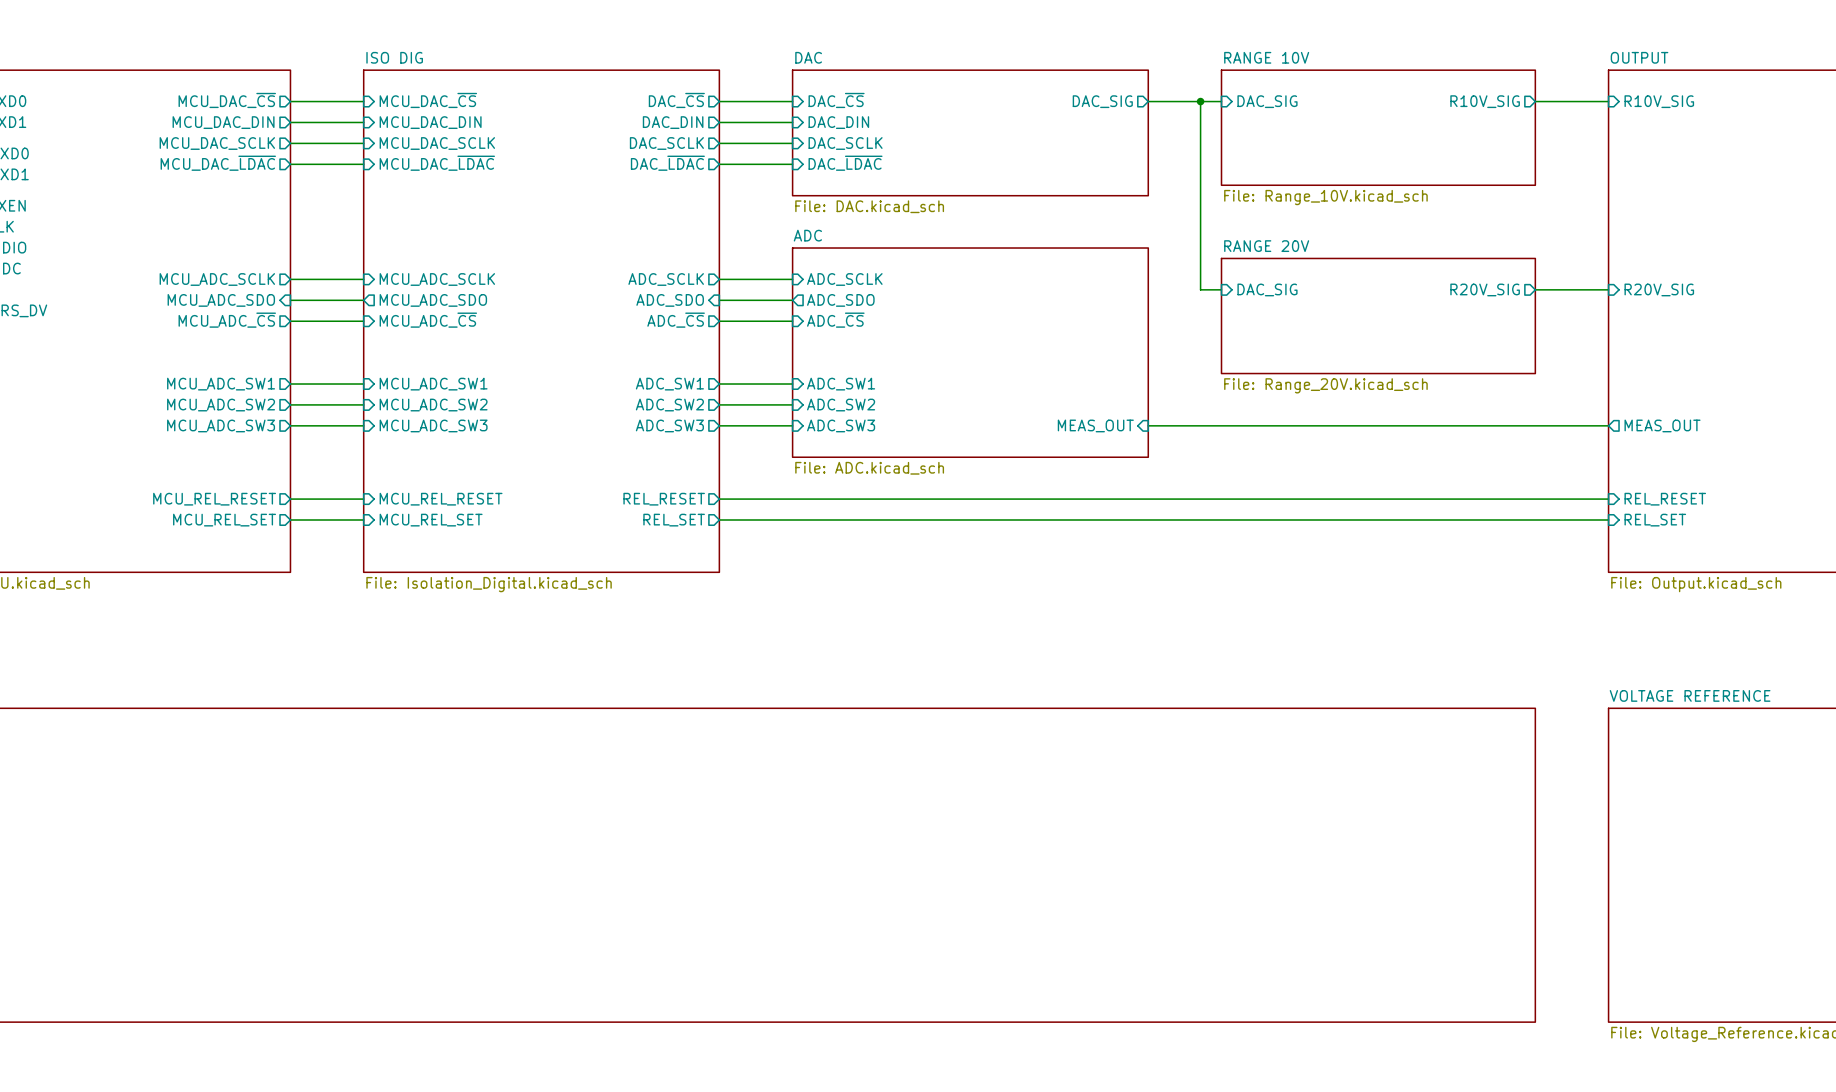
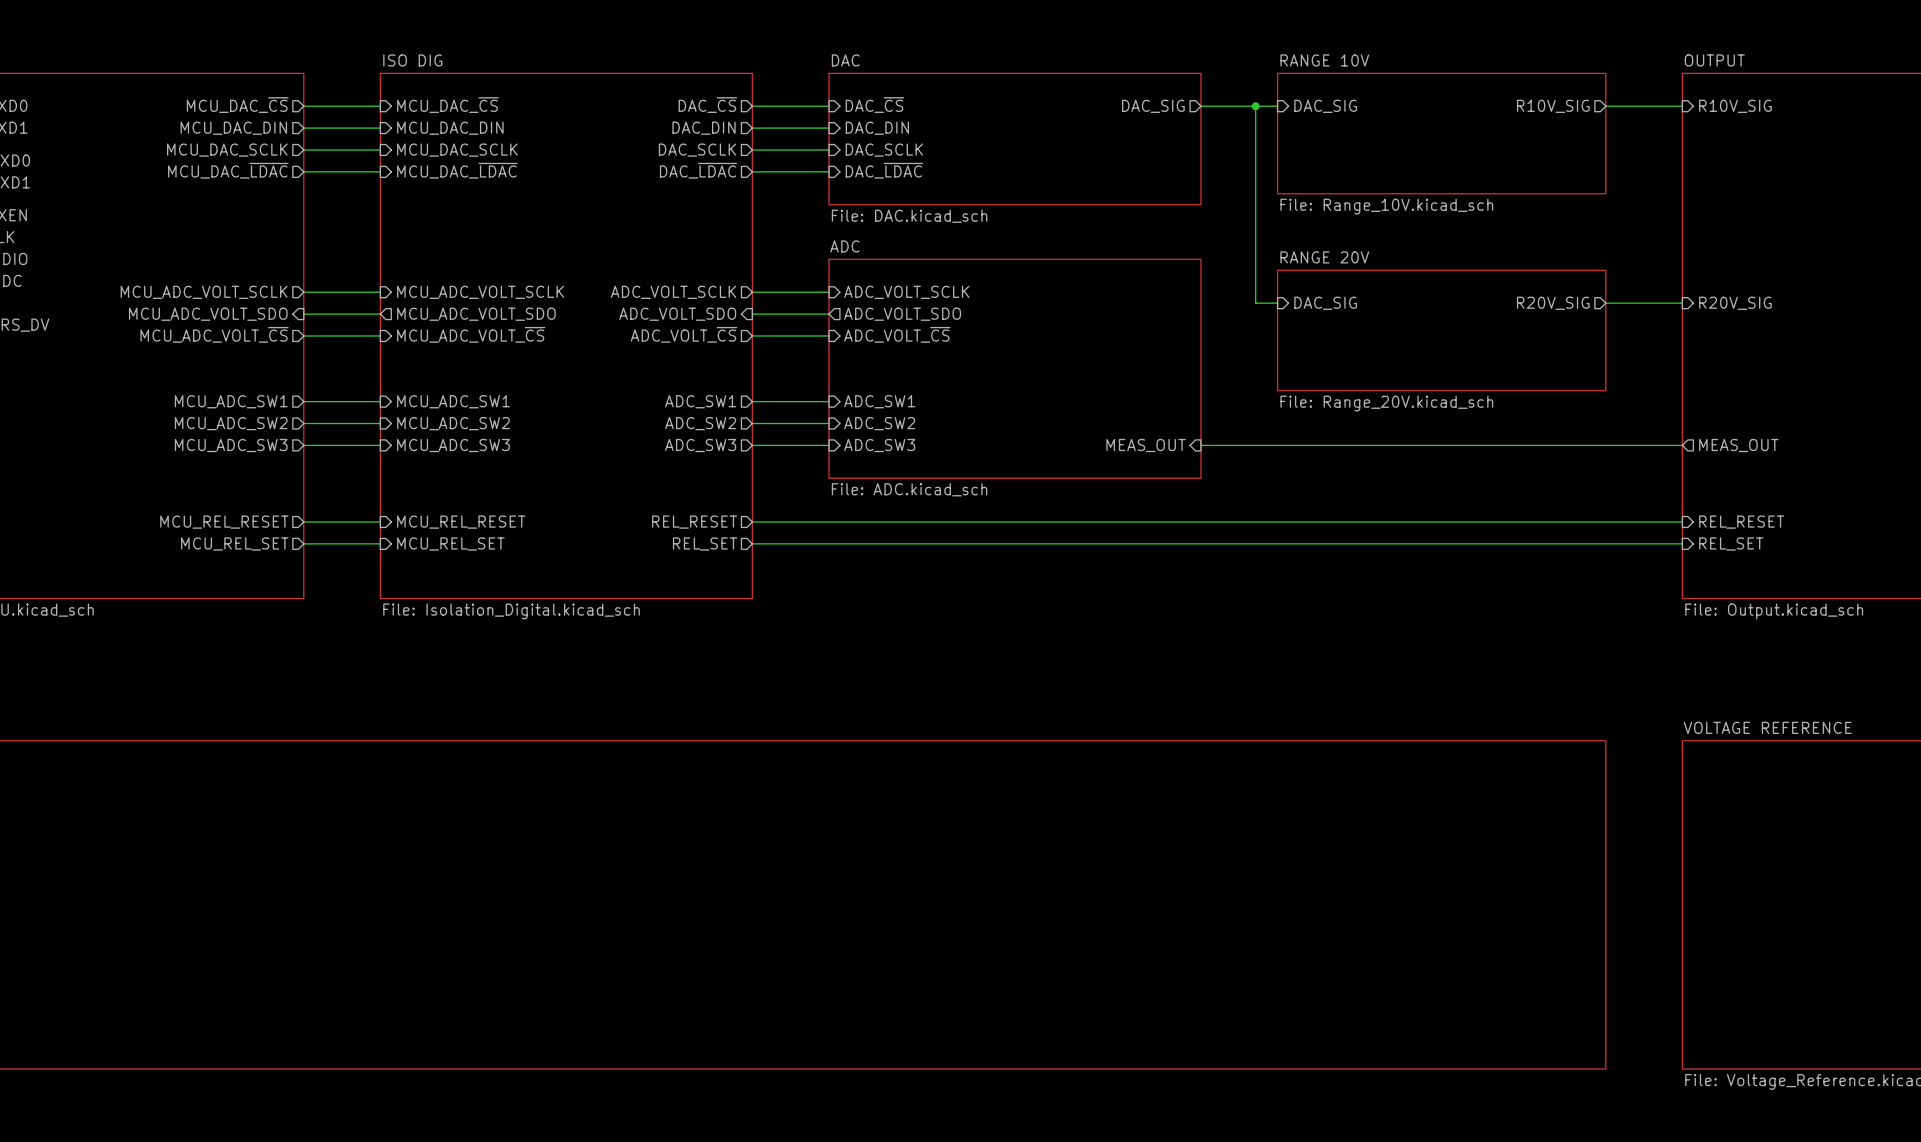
sheet pin: MCU_ADC_SCLK (217, 279) -> MCU_ADC_VOLT_SCLK (204, 292)
sheet pin: MCU_ADC_SCLK (437, 279) -> MCU_ADC_VOLT_SCLK (480, 292)
sheet pin: ADC_SCLK (666, 279) -> ADC_VOLT_SCLK (673, 292)
sheet pin: ADC_SCLK (844, 279) -> ADC_VOLT_SCLK (906, 292)
sheet pin: MCU_ADC_SDO (221, 300) -> MCU_ADC_VOLT_SDO (208, 314)
sheet pin: MCU_ADC_SDO (433, 300) -> MCU_ADC_VOLT_SDO (476, 314)
sheet pin: ADC_SDO (670, 300) -> ADC_VOLT_SDO (677, 314)
sheet pin: ADC_SDO (840, 300) -> ADC_VOLT_SDO (902, 314)
sheet pin: MCU_ADC_~{CS} (227, 320) -> MCU_ADC_VOLT_~{CS} (214, 334)
sheet pin: MCU_ADC_~{CS} (428, 320) -> MCU_ADC_VOLT_~{CS} (471, 334)
sheet pin: ADC_~{CS} (676, 320) -> ADC_VOLT_~{CS} (683, 334)
sheet pin: ADC_~{CS} (835, 320) -> ADC_VOLT_~{CS} (897, 334)

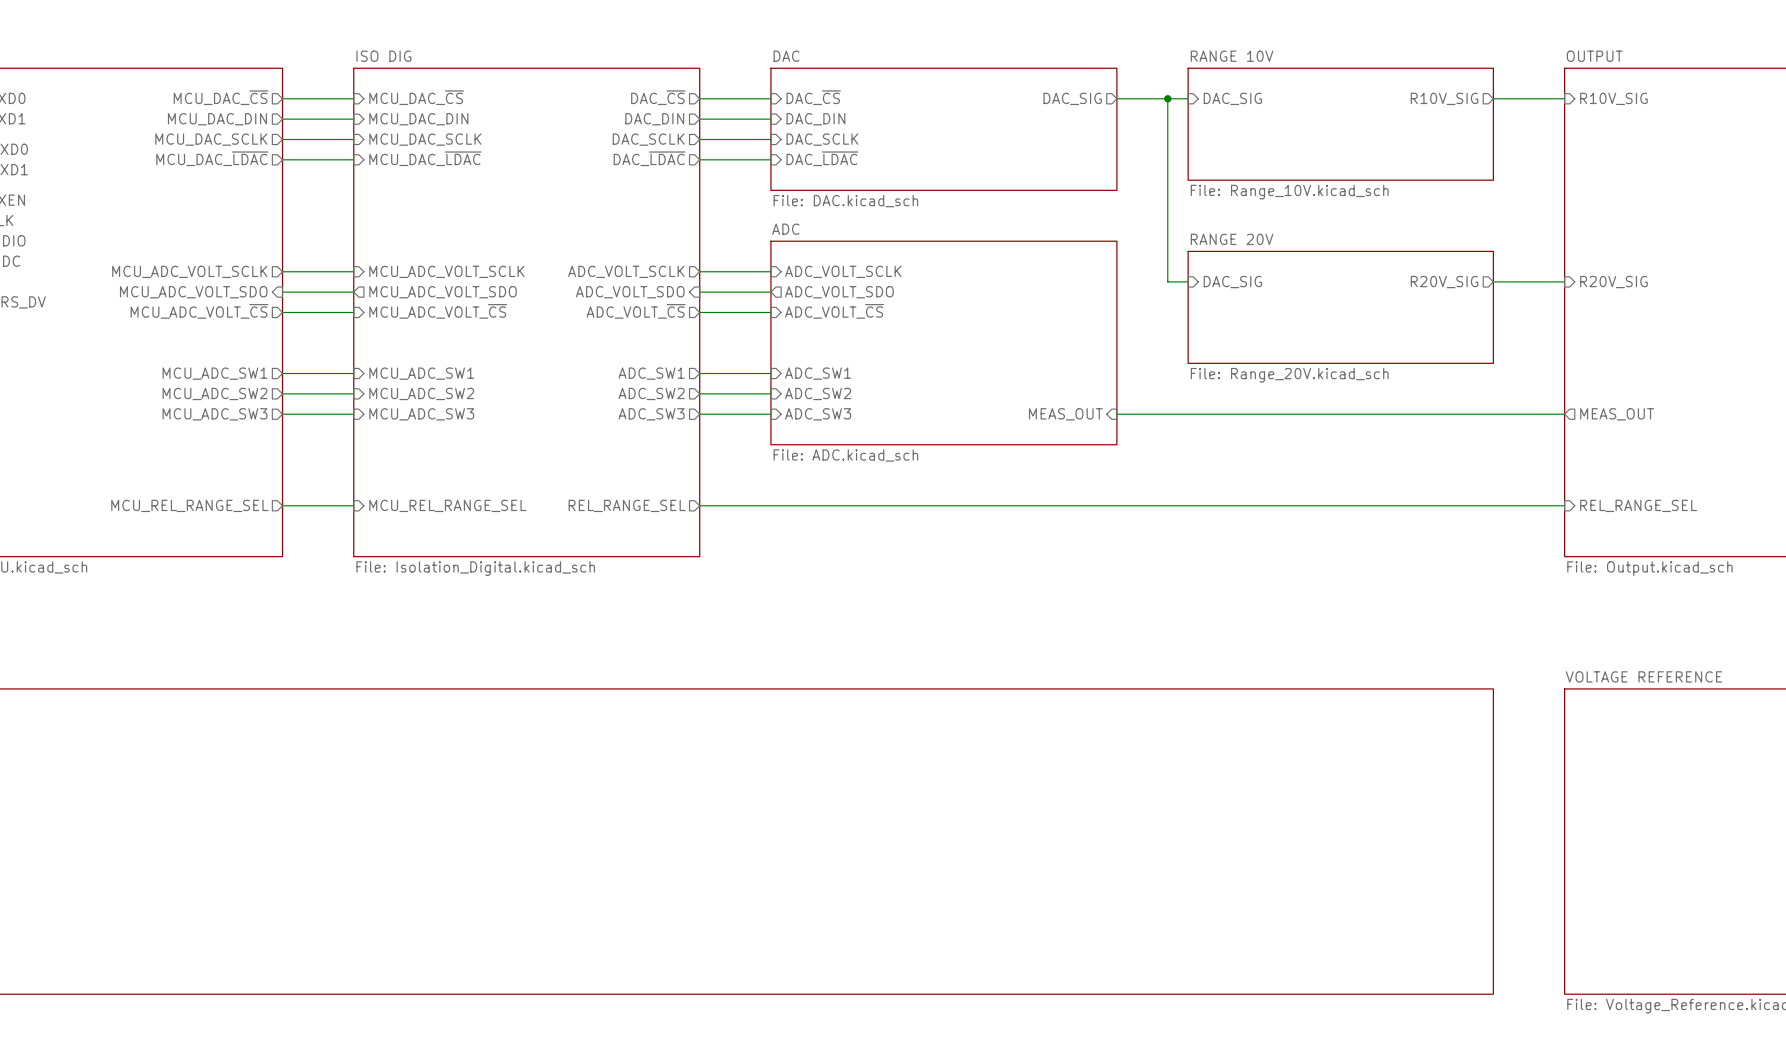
wire: (303, 521) (380, 521) -> none
wire: (752, 521) (1682, 521) -> none
sheet pin: MCU_REL_RESET (224, 522) -> none
sheet pin: MCU_REL_RESET (461, 522) -> none
sheet pin: REL_RESET (694, 522) -> none
sheet pin: REL_RESET (1741, 522) -> none
sheet pin: MCU_REL_SET (234, 543) -> MCU_REL_RANGE_SEL (189, 505)
sheet pin: MCU_REL_SET (450, 543) -> MCU_REL_RANGE_SEL (447, 505)
sheet pin: REL_SET (705, 543) -> REL_RANGE_SEL (627, 505)
sheet pin: REL_SET (1731, 543) -> REL_RANGE_SEL (1638, 505)

